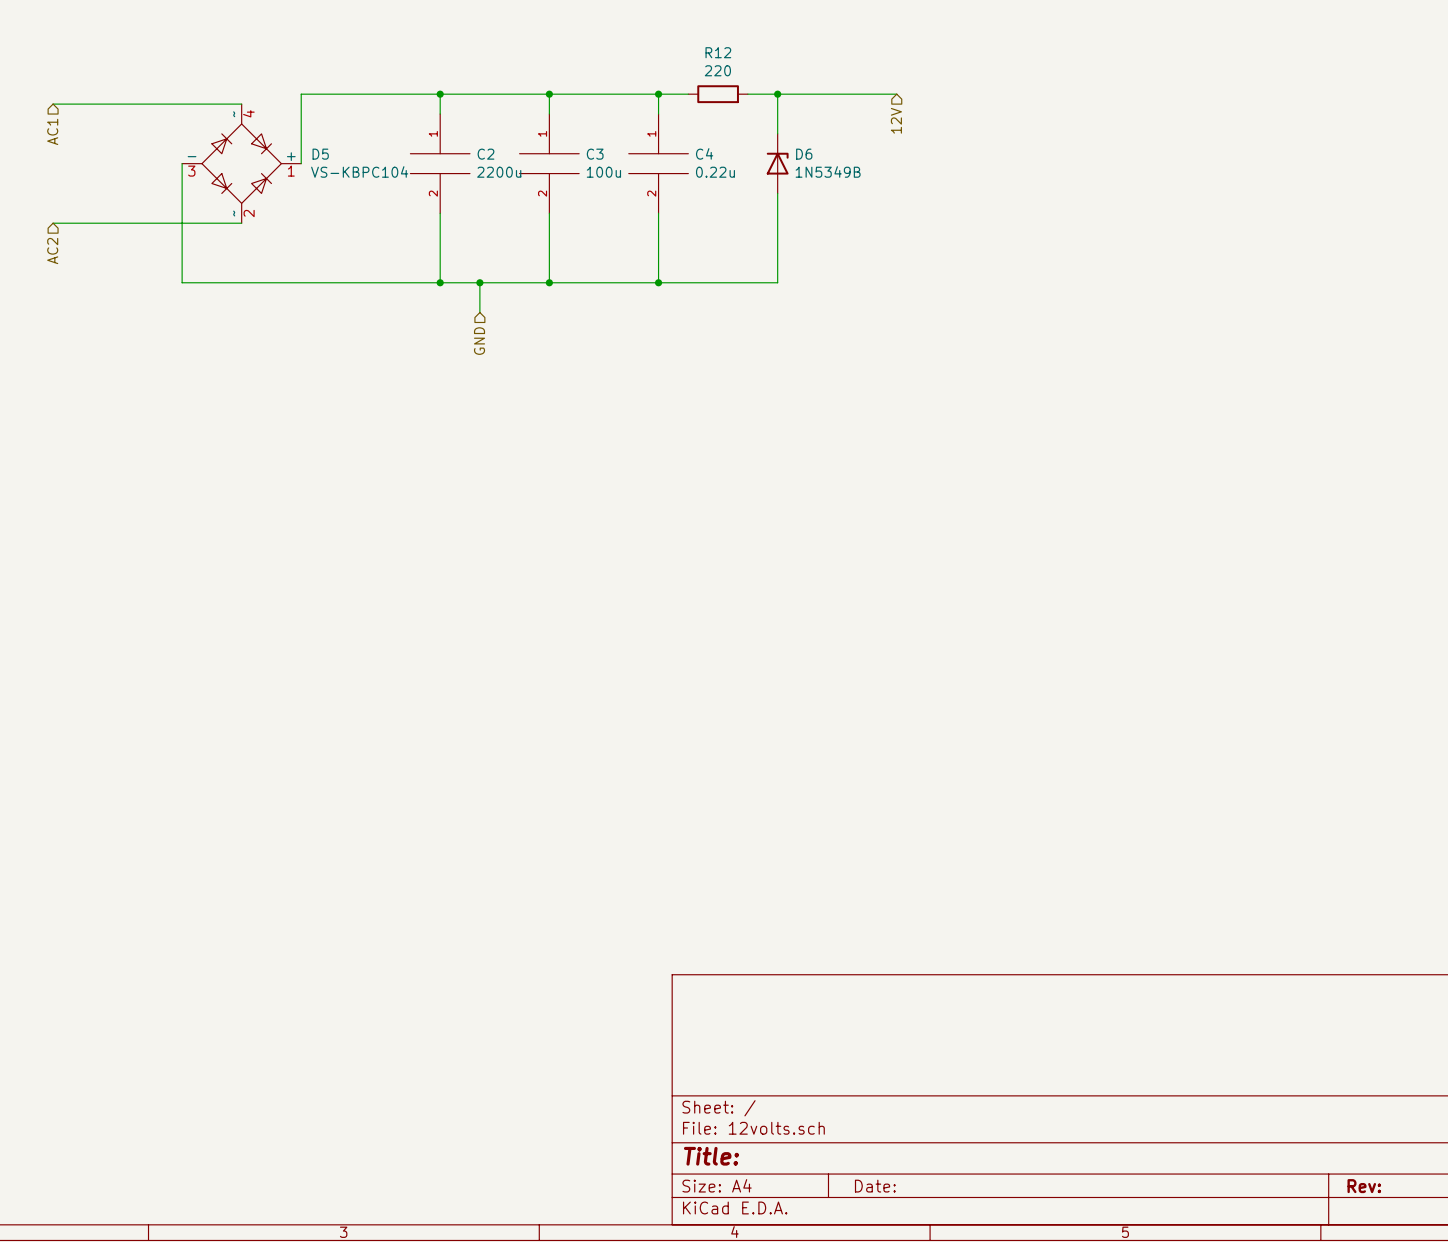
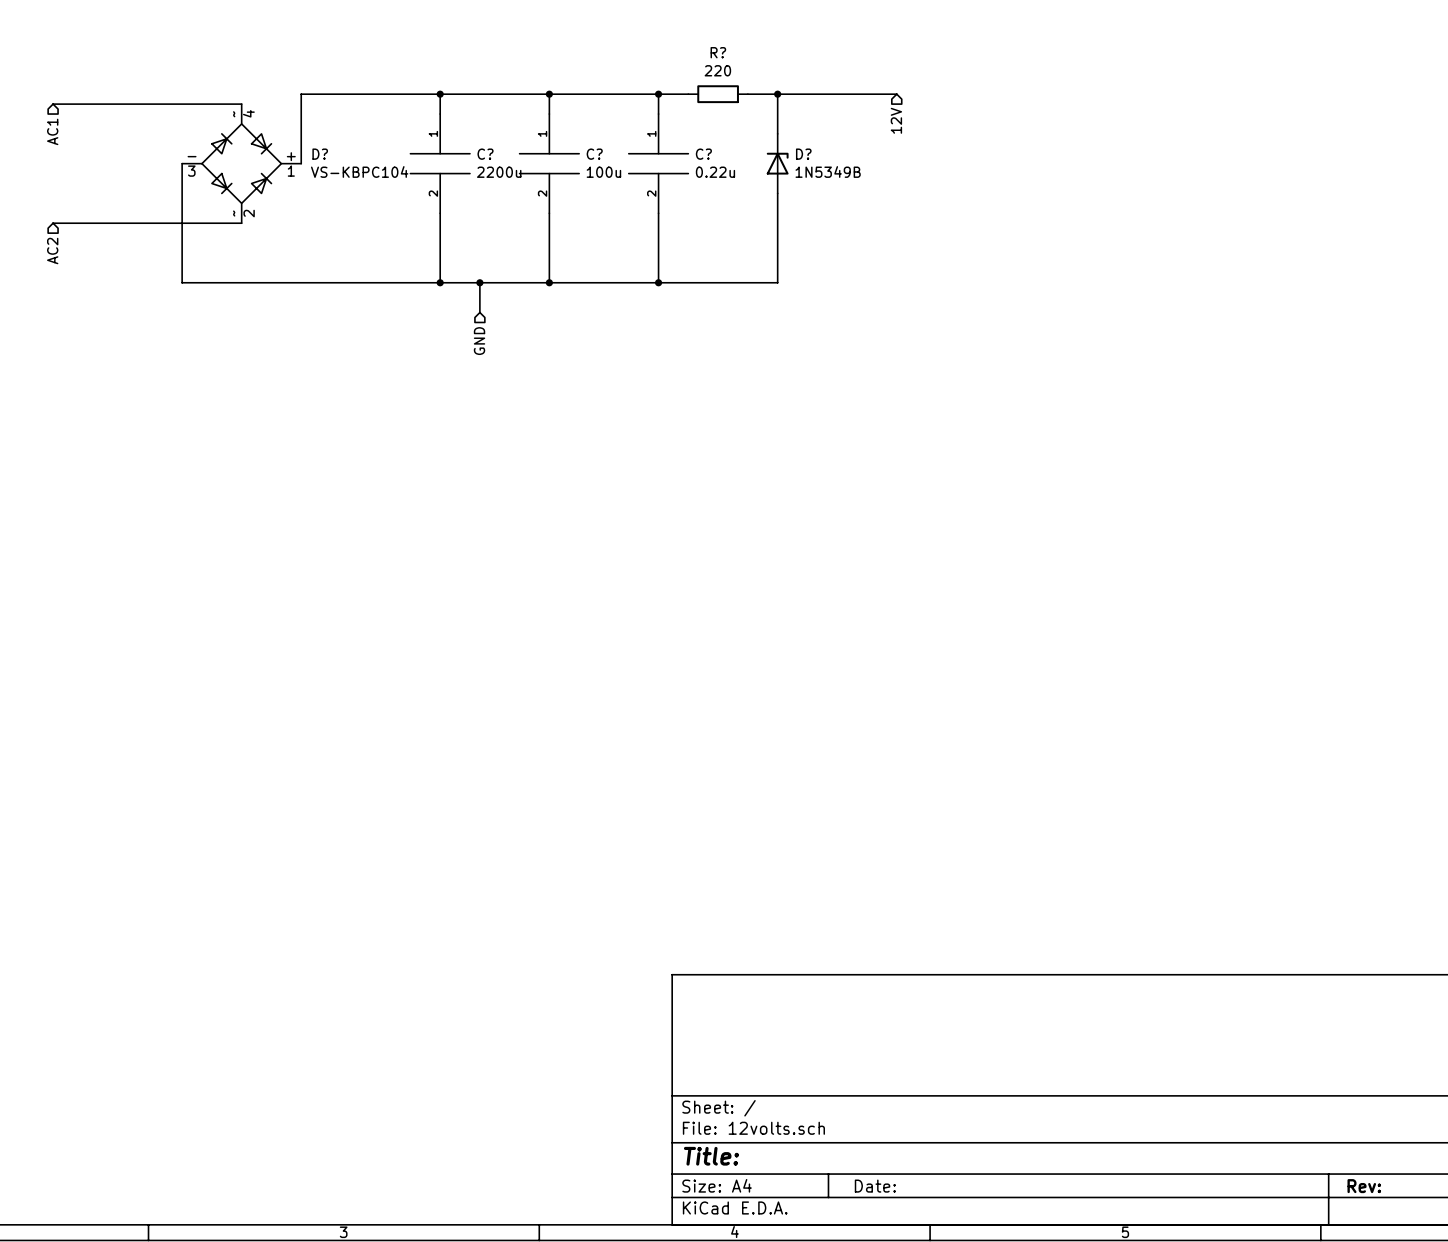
R12 name: R12 (718, 52) -> R? (718, 52)
C4 name: C4 (704, 153) -> C? (703, 154)
D5 name: D5 (320, 154) -> D? (320, 154)
C2 name: C2 (486, 154) -> C? (485, 154)
C3 name: C3 (595, 154) -> C? (594, 154)
D6 name: D6 (804, 154) -> D? (803, 154)

